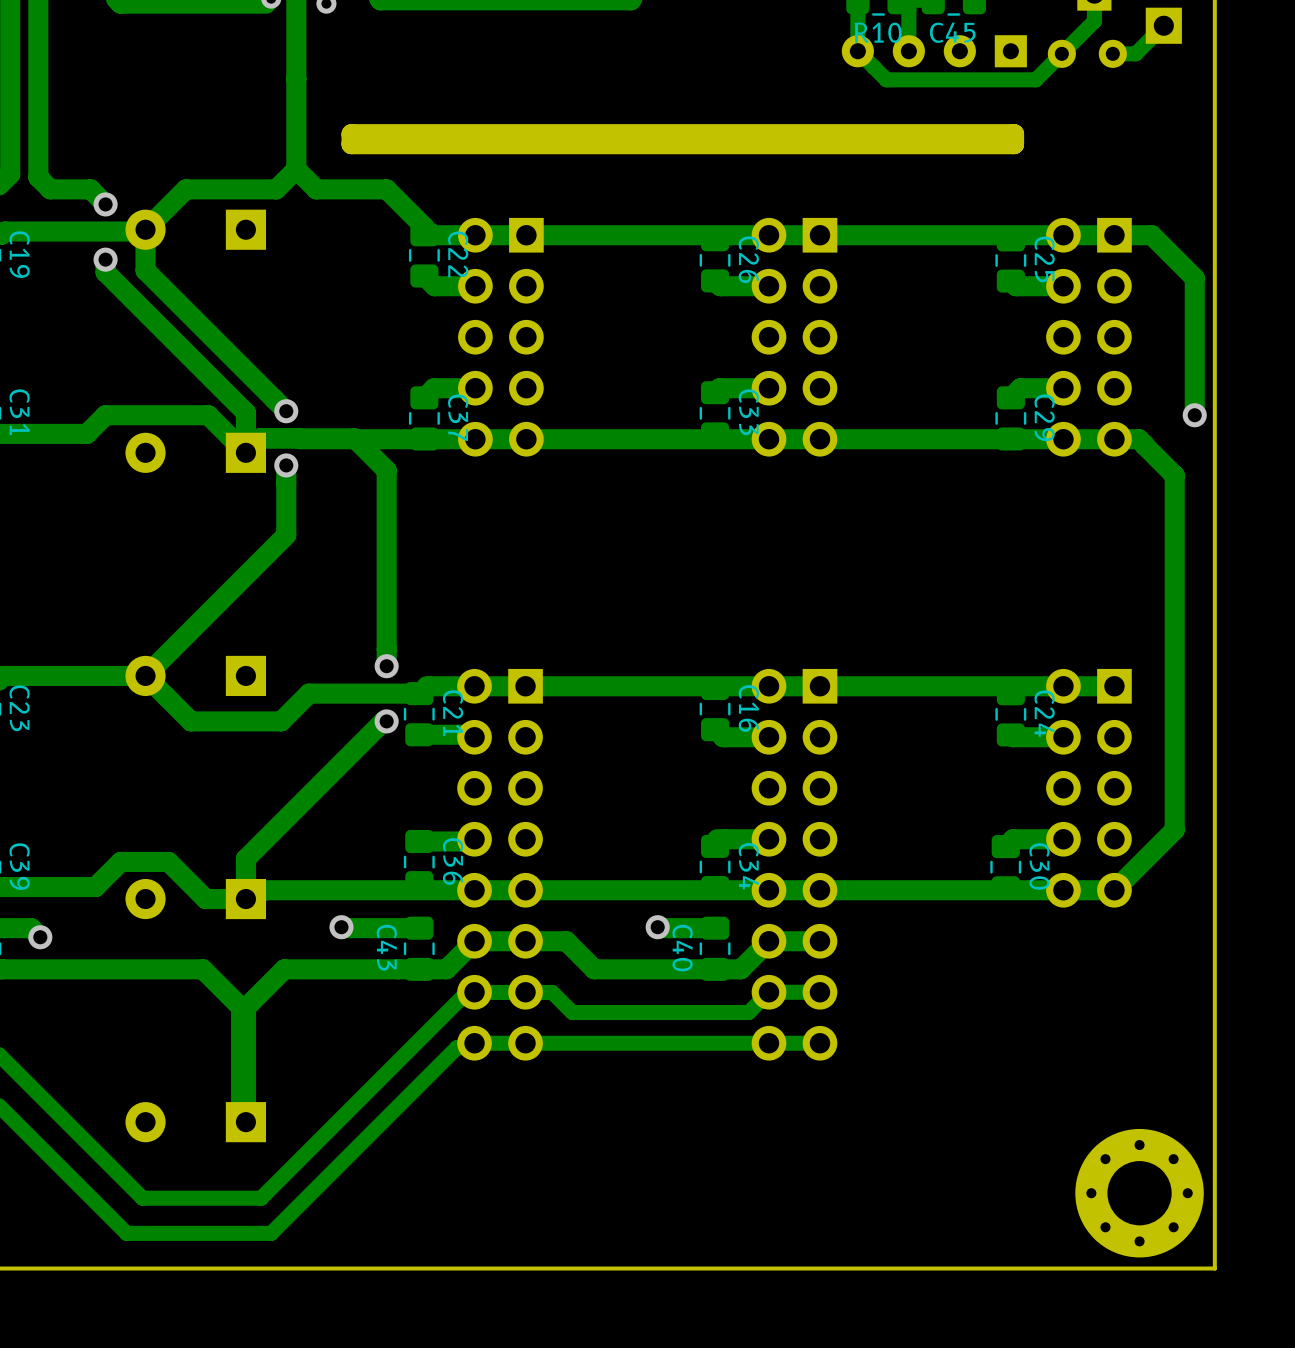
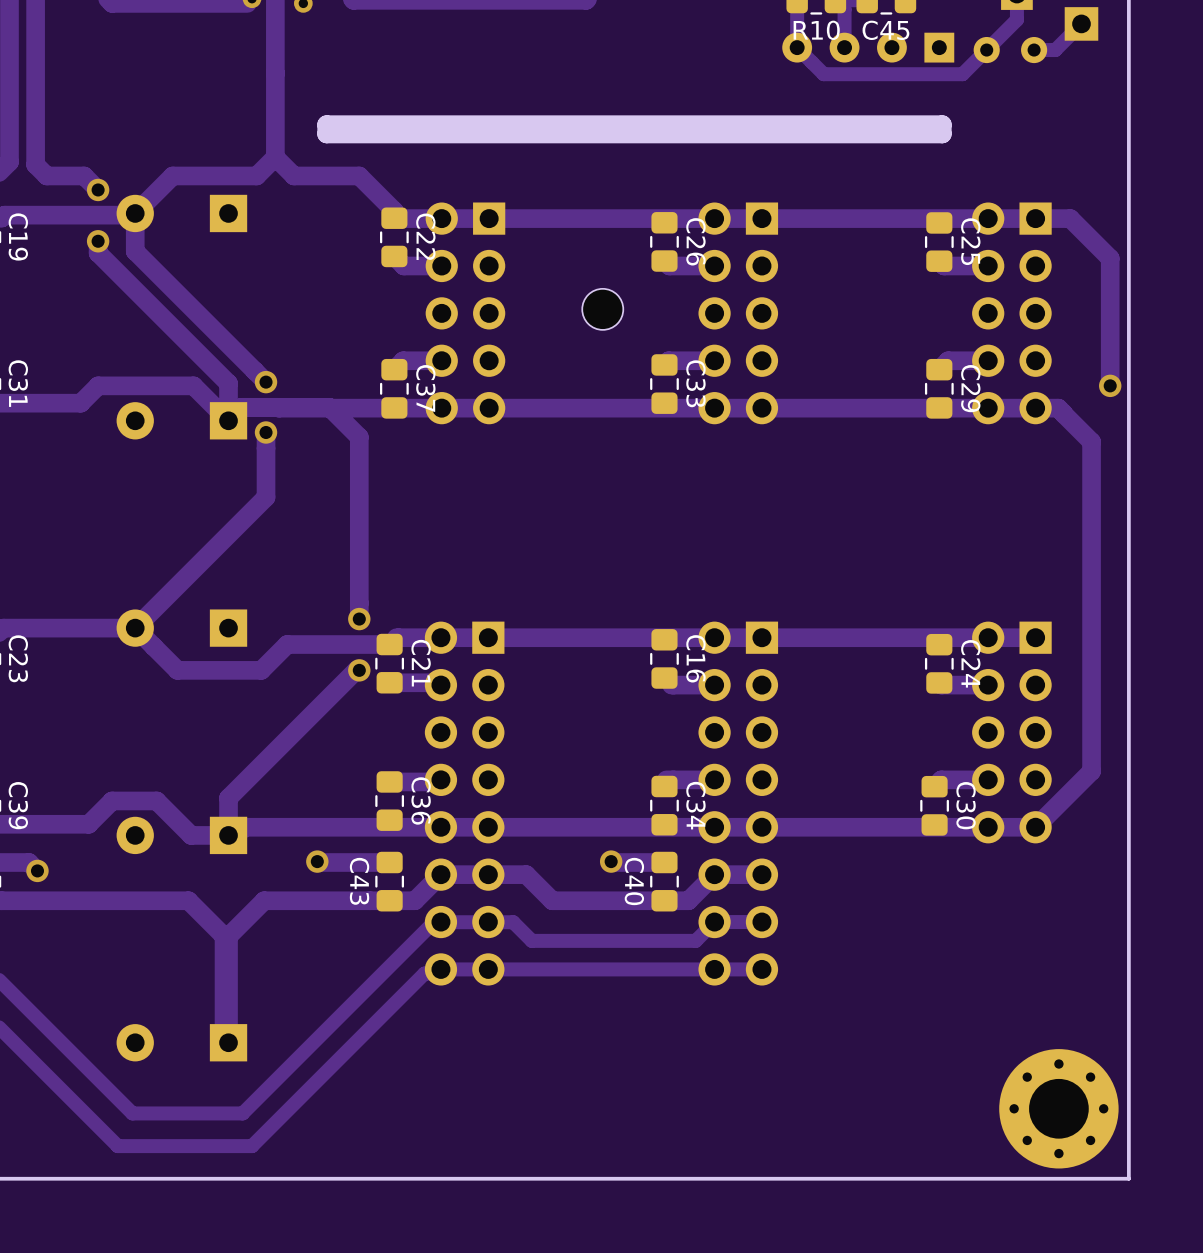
part: none -> (602, 309)

